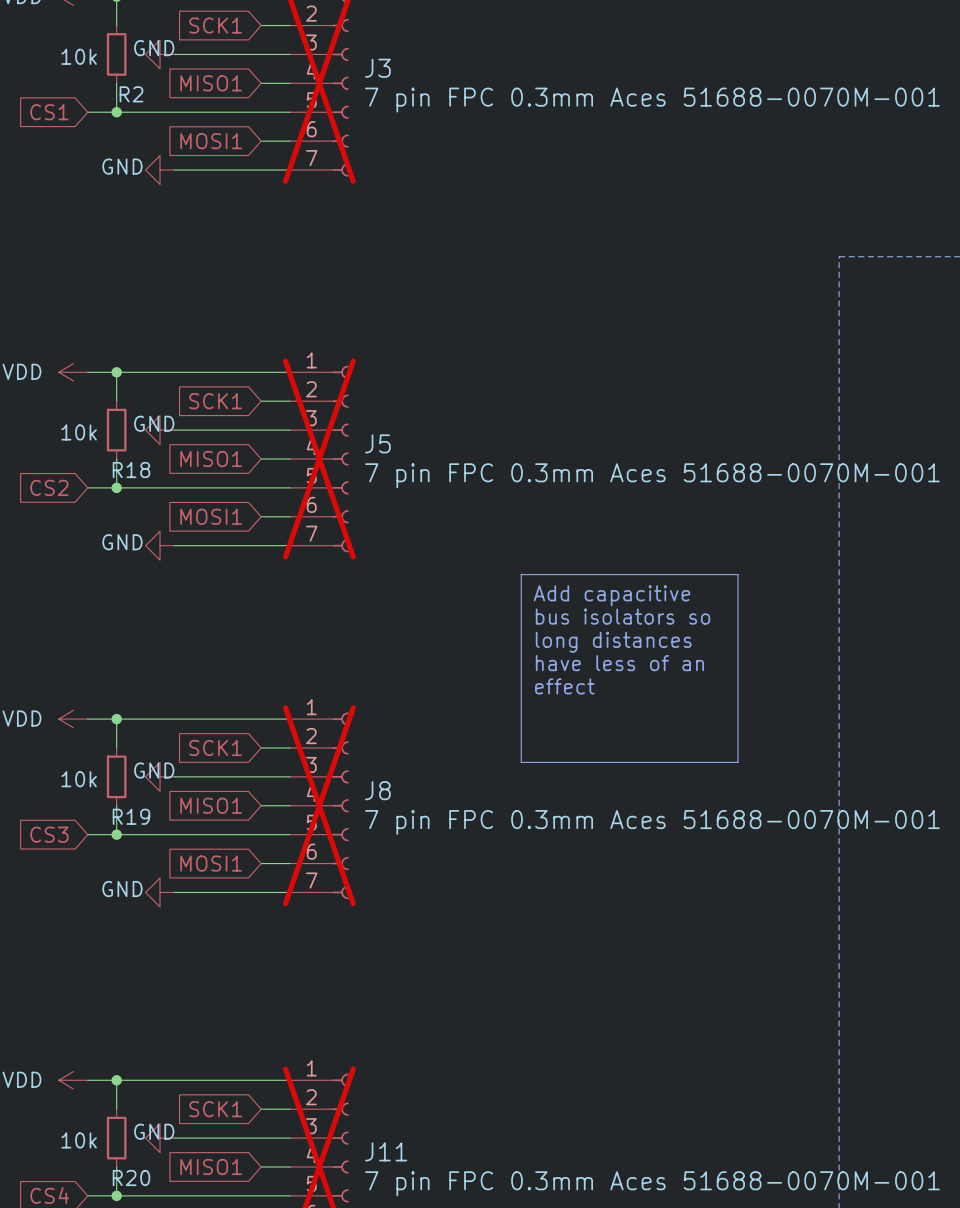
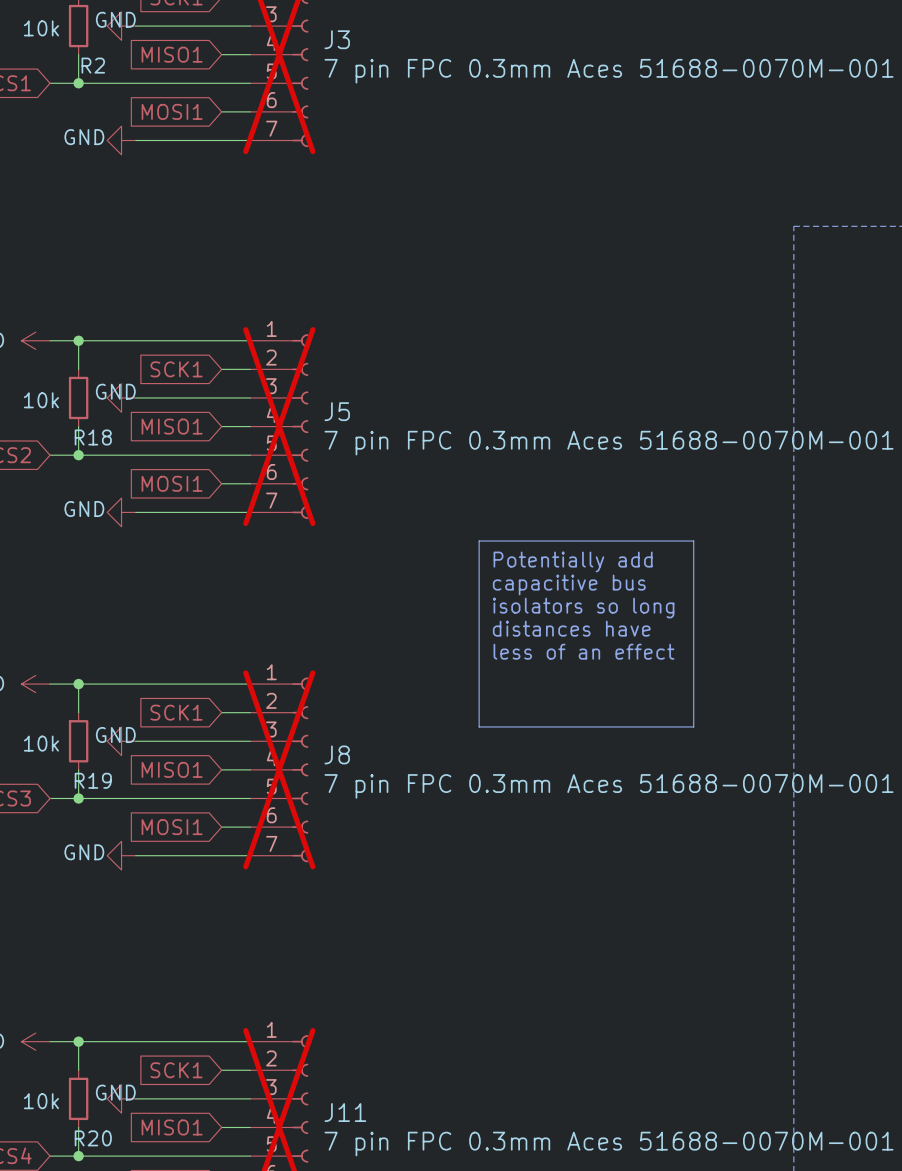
text: Add capacitive (612, 595) -> Potentially add (573, 561)
text: bus isolators so (623, 616) -> capacitive bus (569, 584)
text: long distances (613, 642) -> isolators so long (583, 608)
text: have less of an (619, 663) -> distances have (571, 628)
text: effect (564, 686) -> less of an effect (583, 651)

